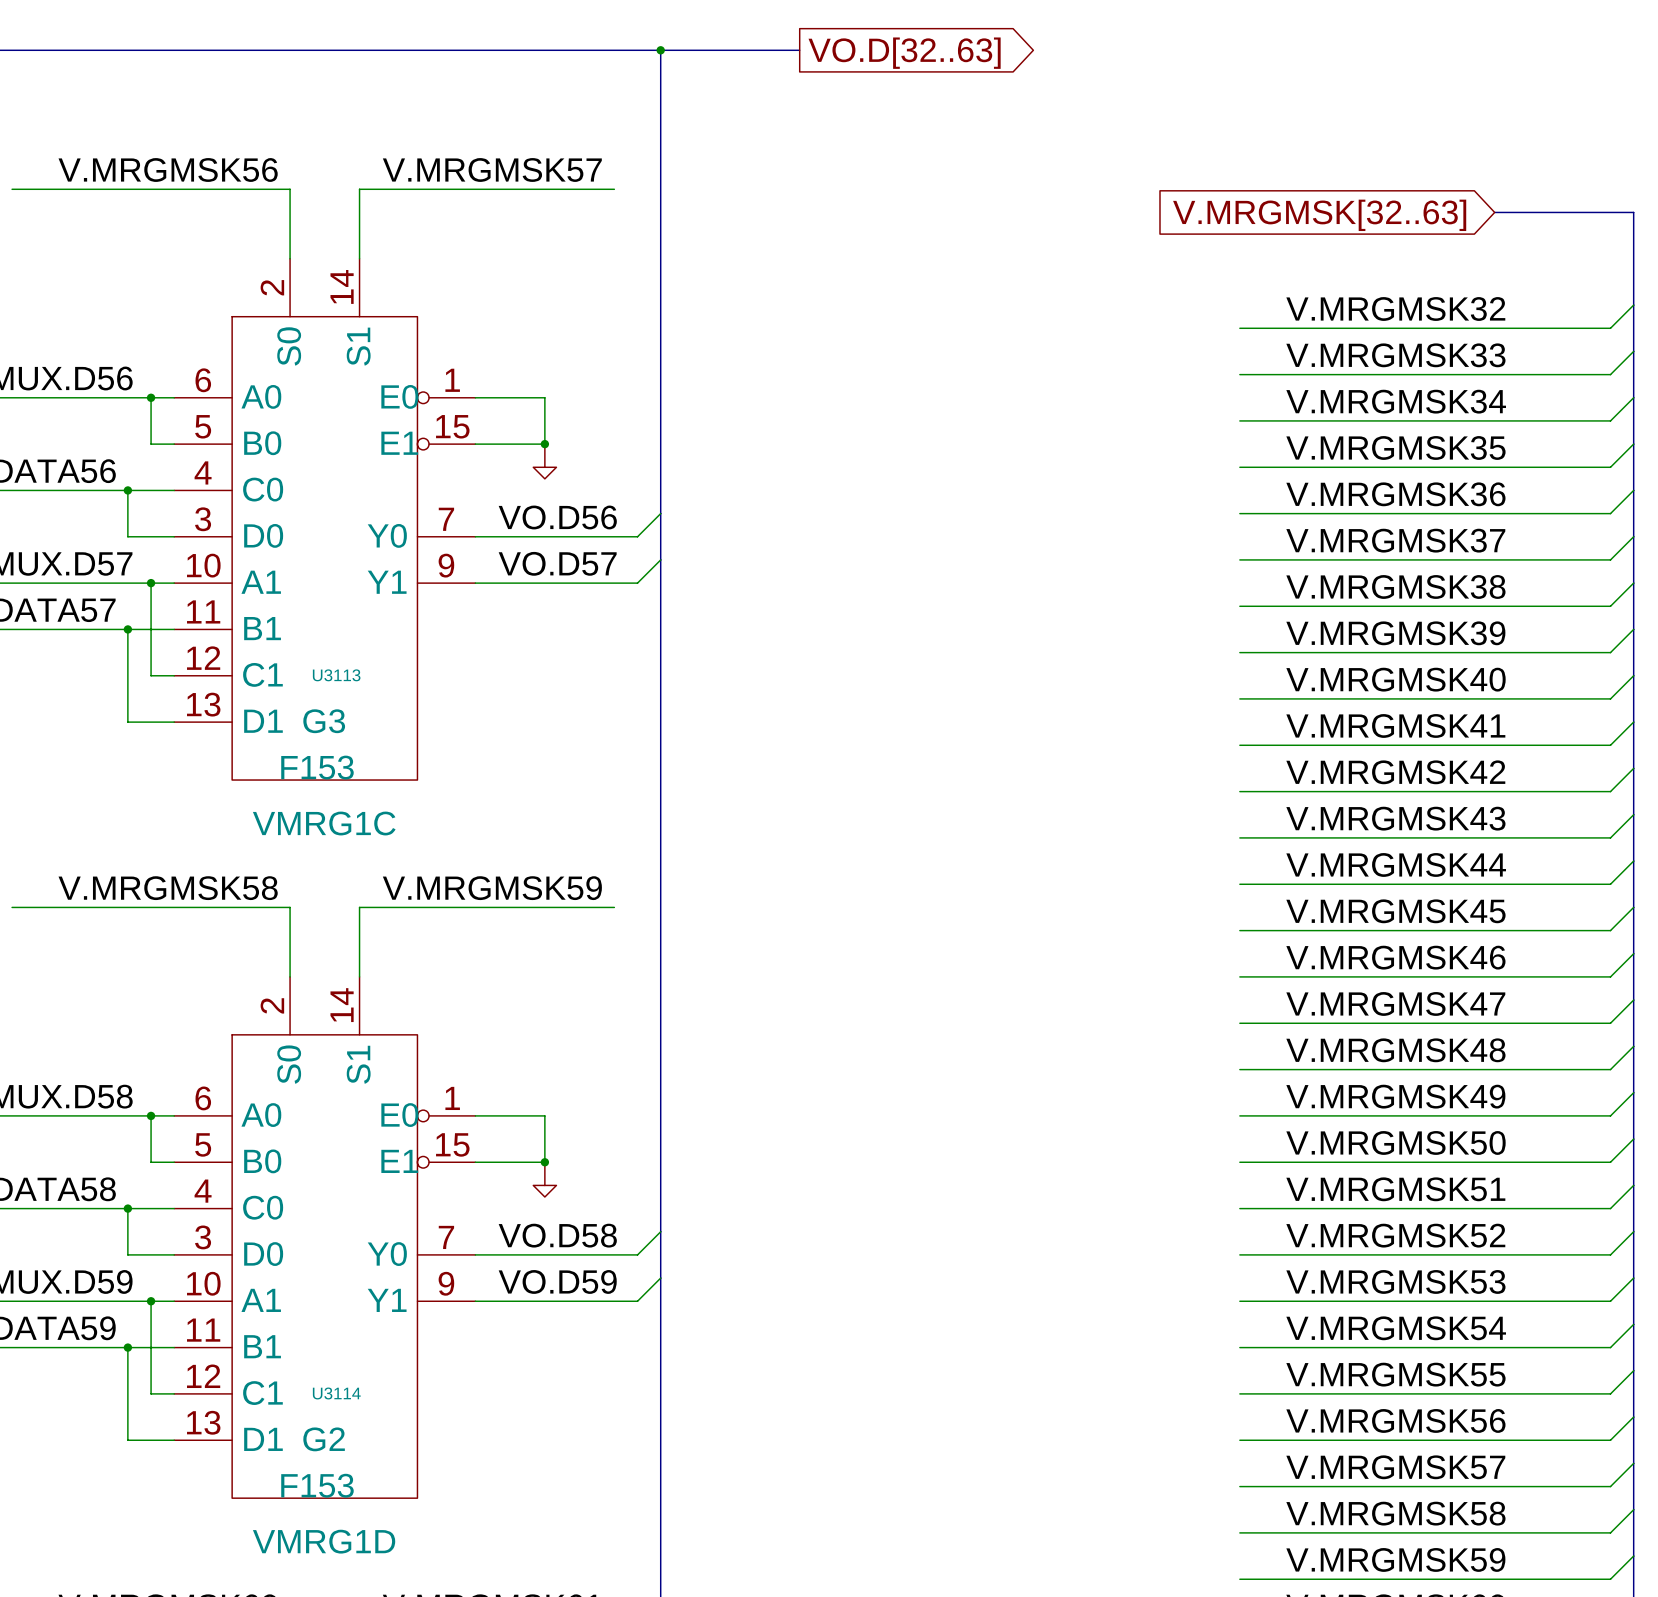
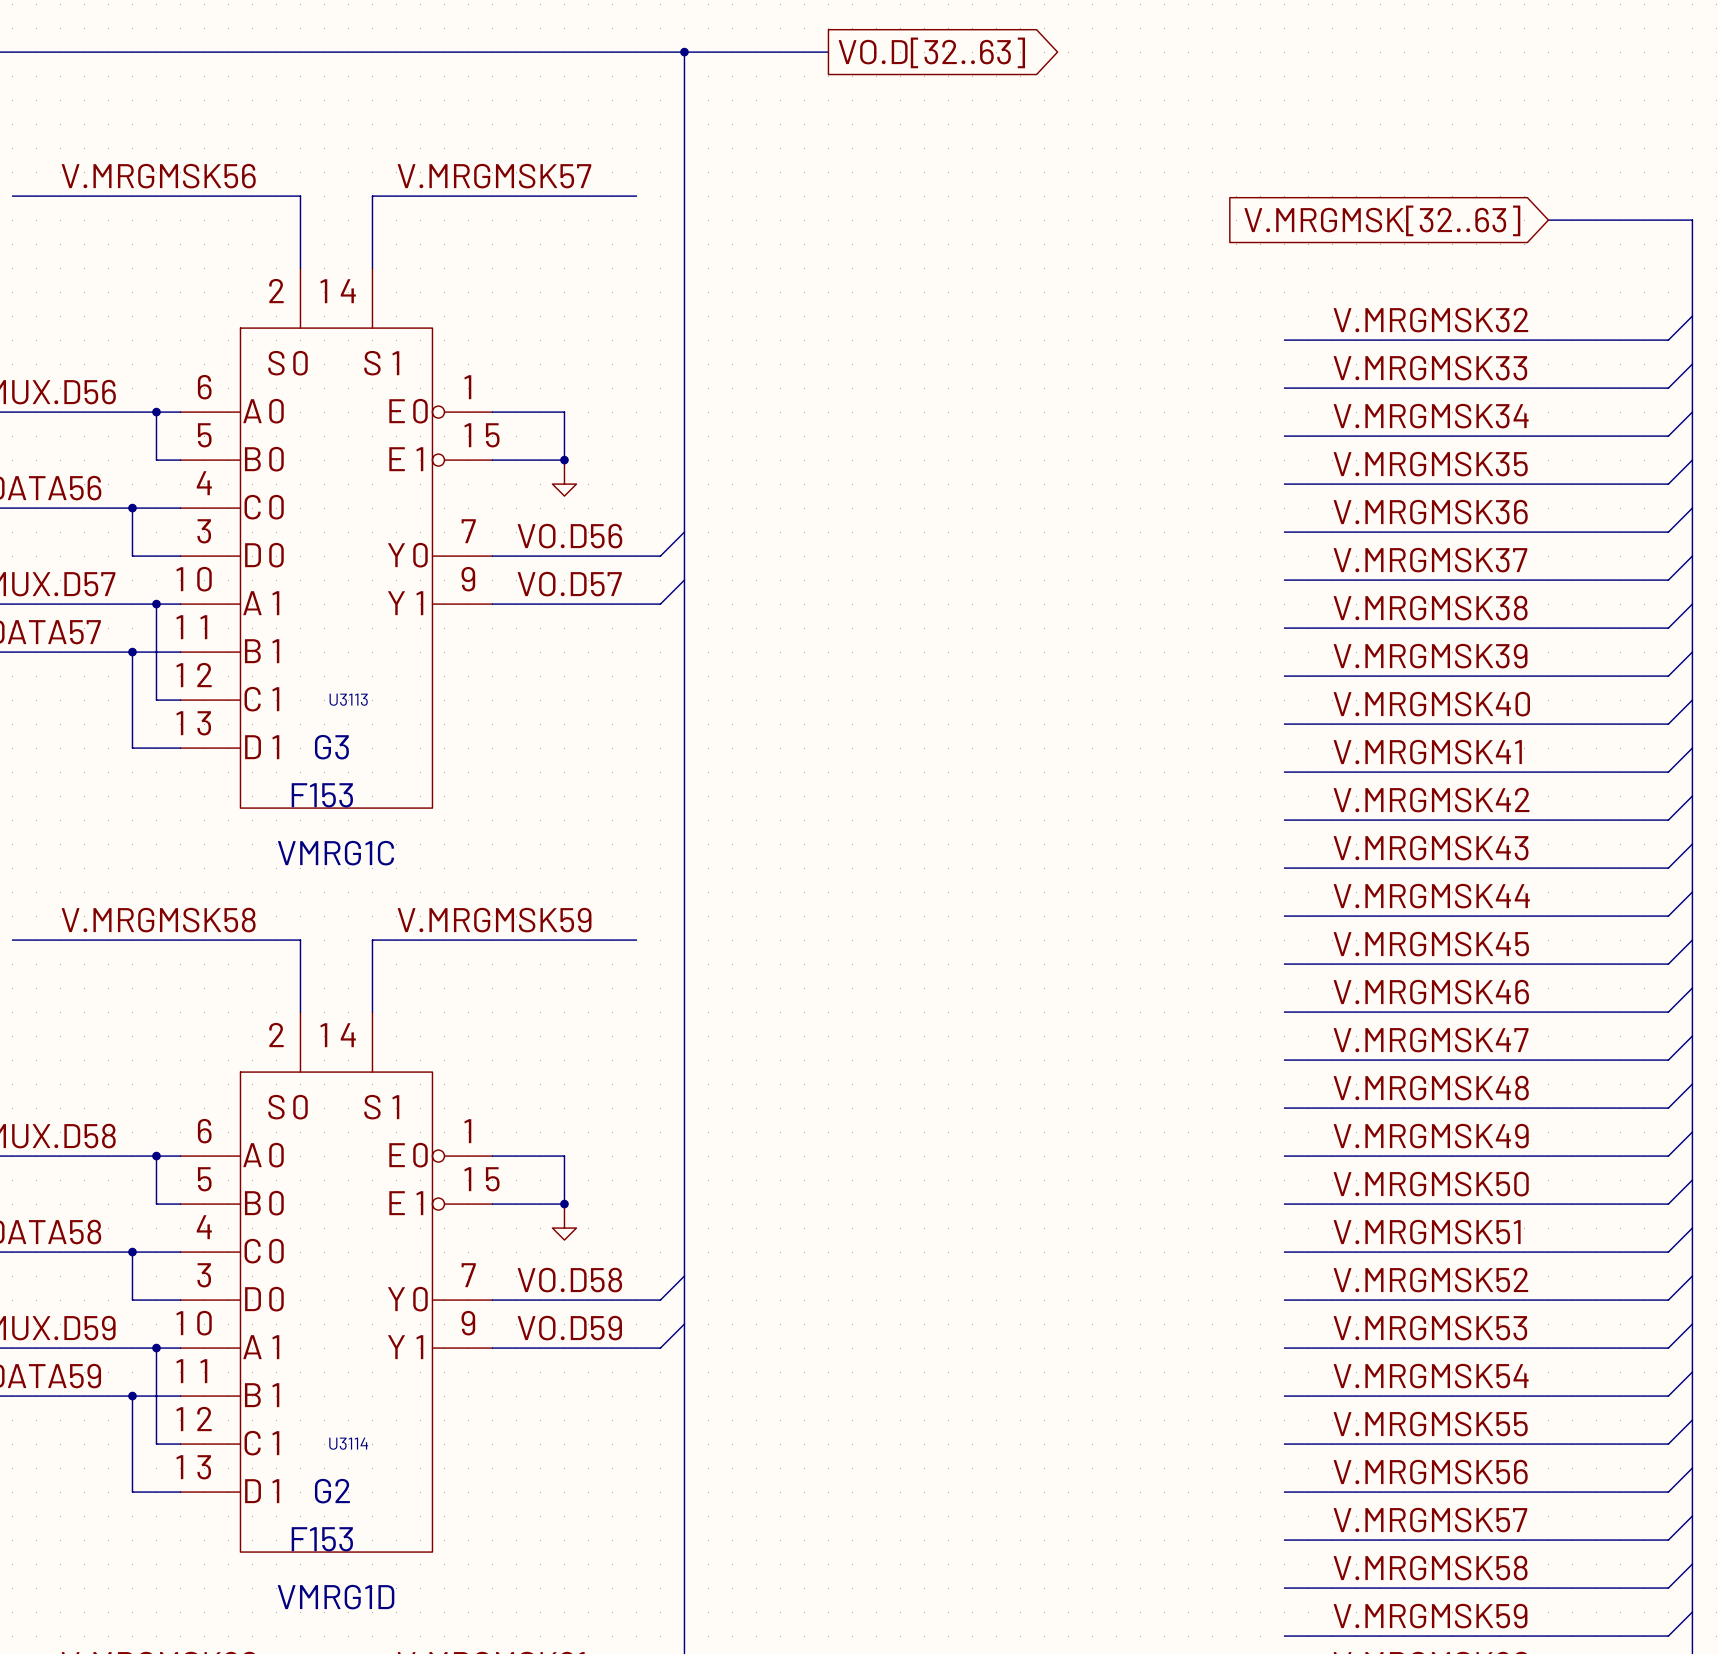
U3113 symbol: [174, 258, 476, 781] -> [180, 268, 493, 809]
U3114 symbol: [174, 976, 476, 1499] -> [180, 1012, 493, 1553]

